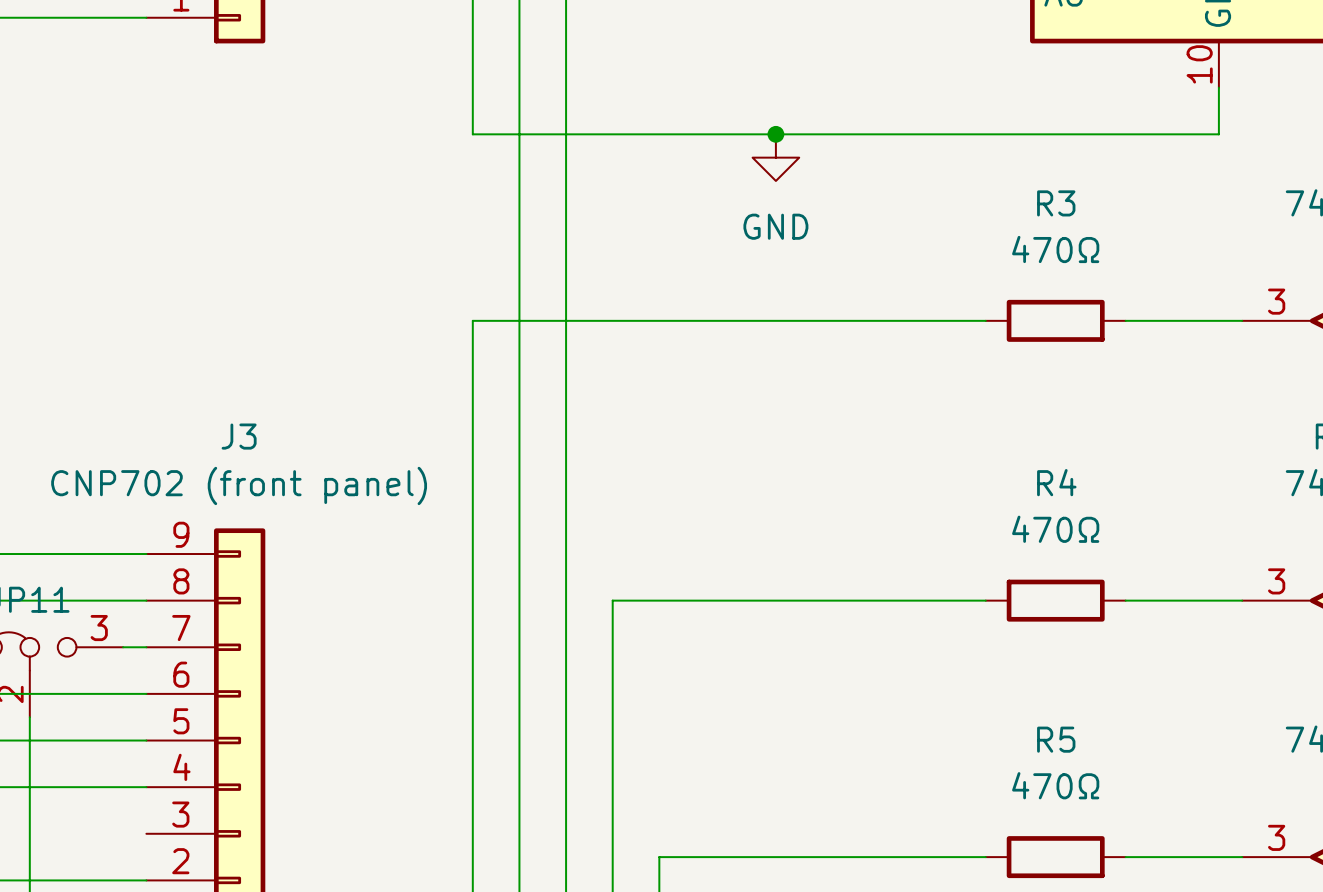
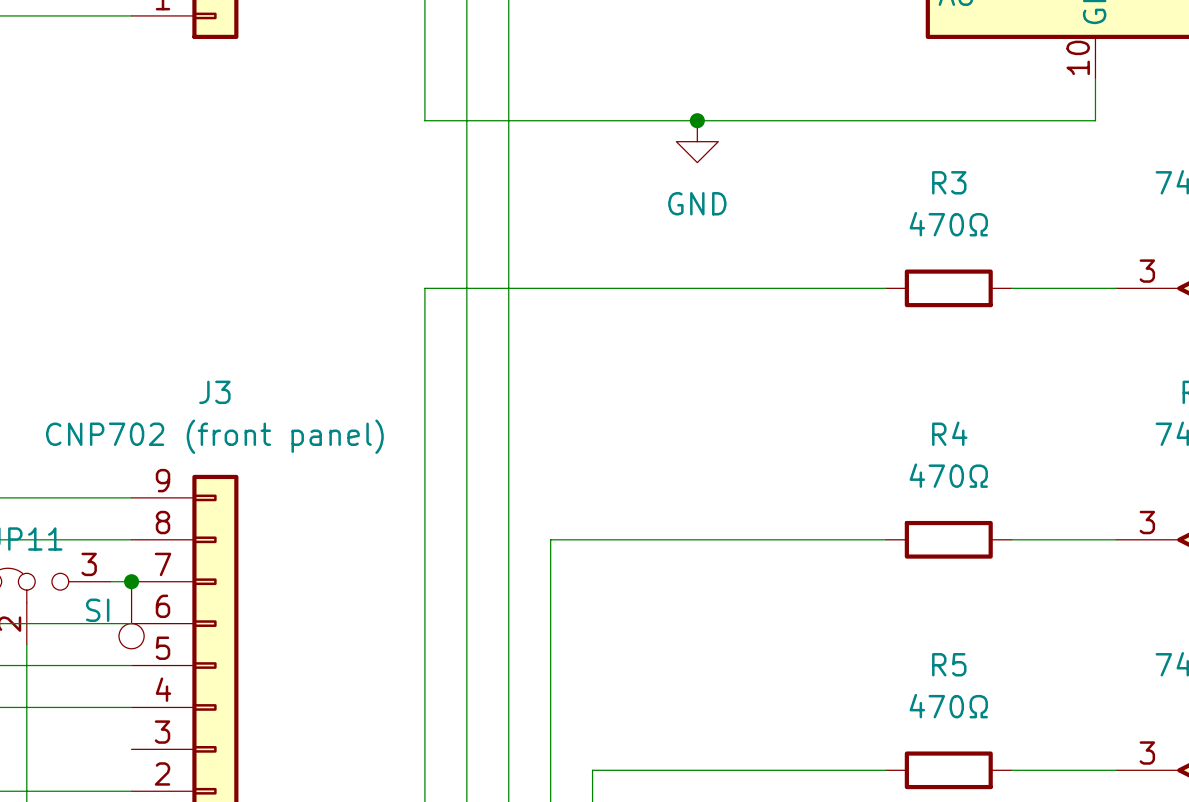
junction: none -> (131, 581)
SI: none -> (131, 615)

